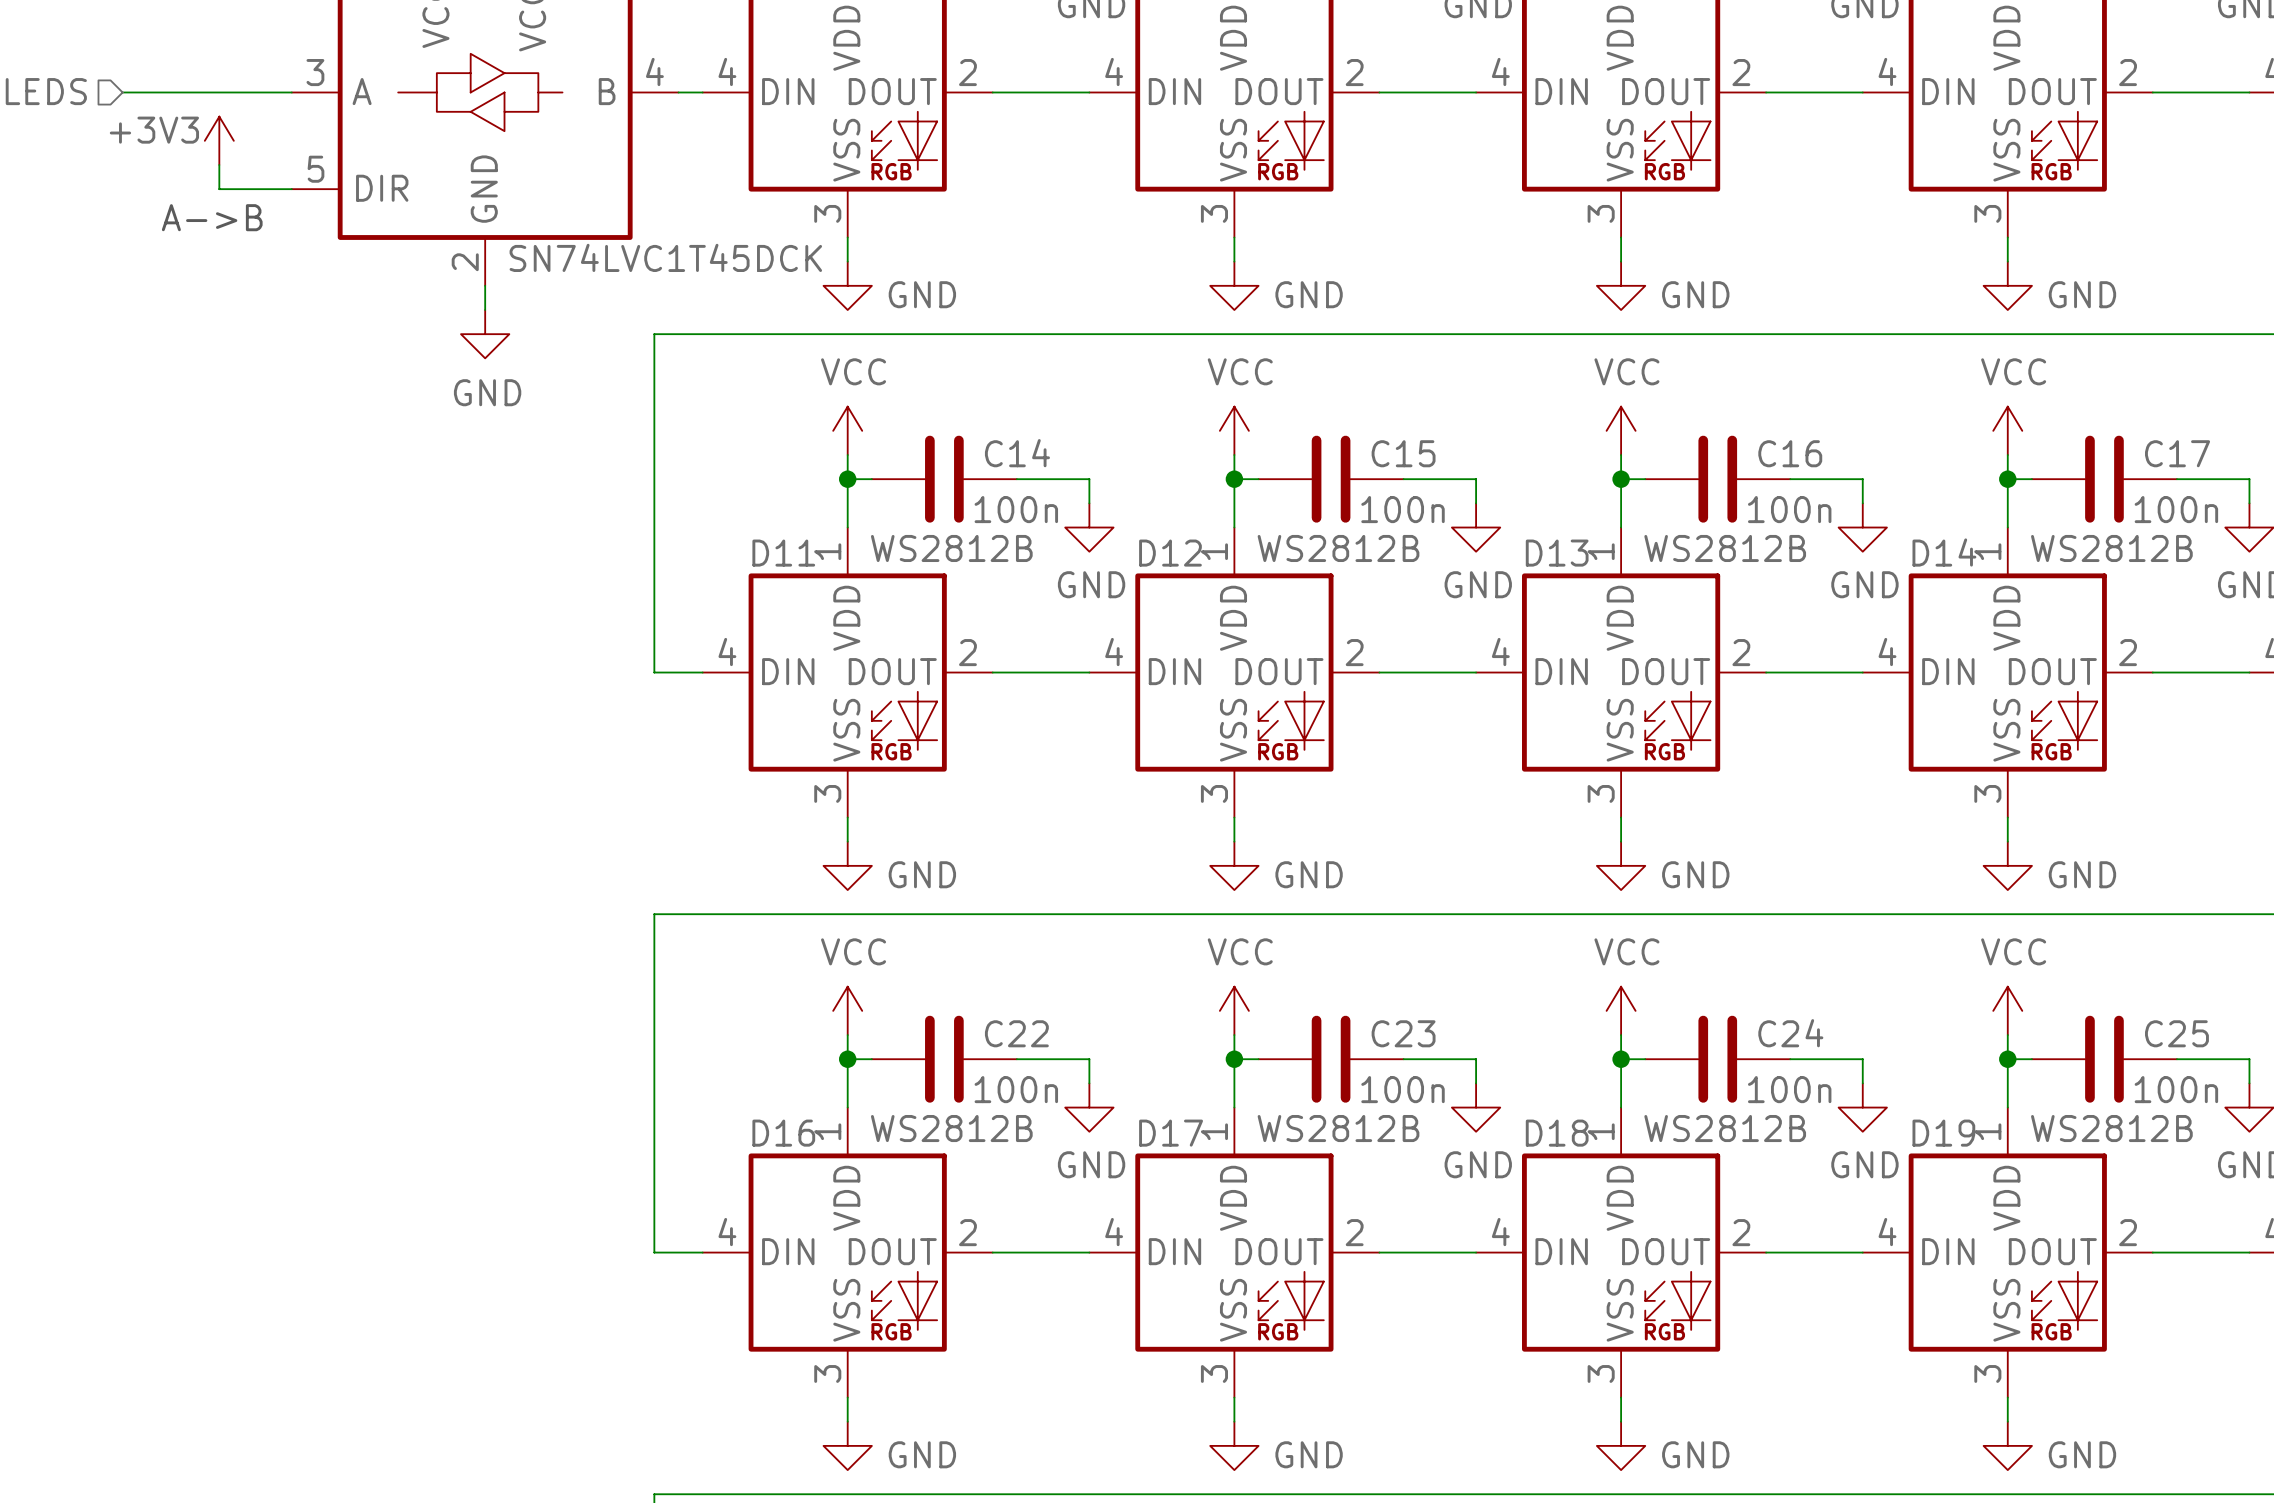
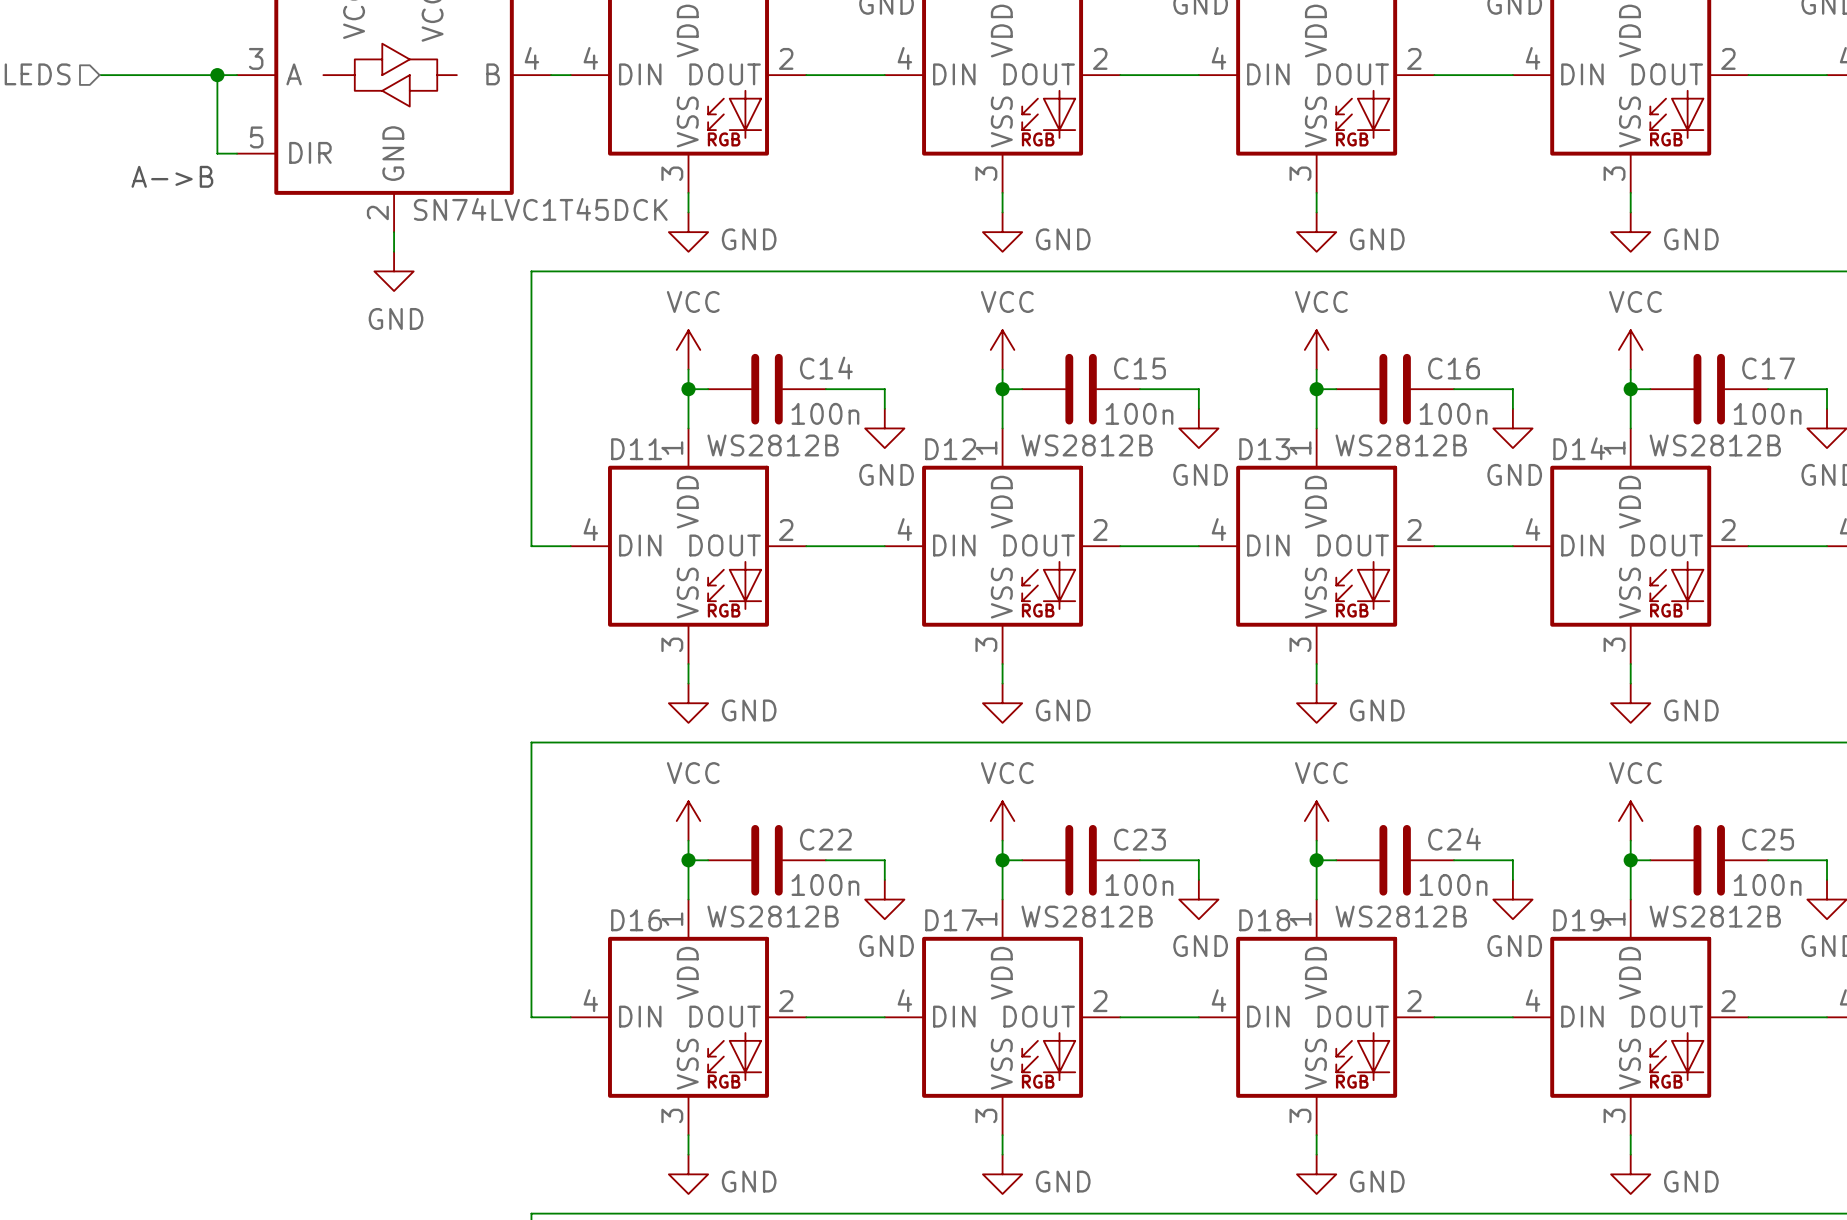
junction: none -> (217, 75)
power symbol: +3V3 (219, 140) -> none
wire: (219, 164) (219, 189) (267, 189) -> (217, 75) (217, 153)

